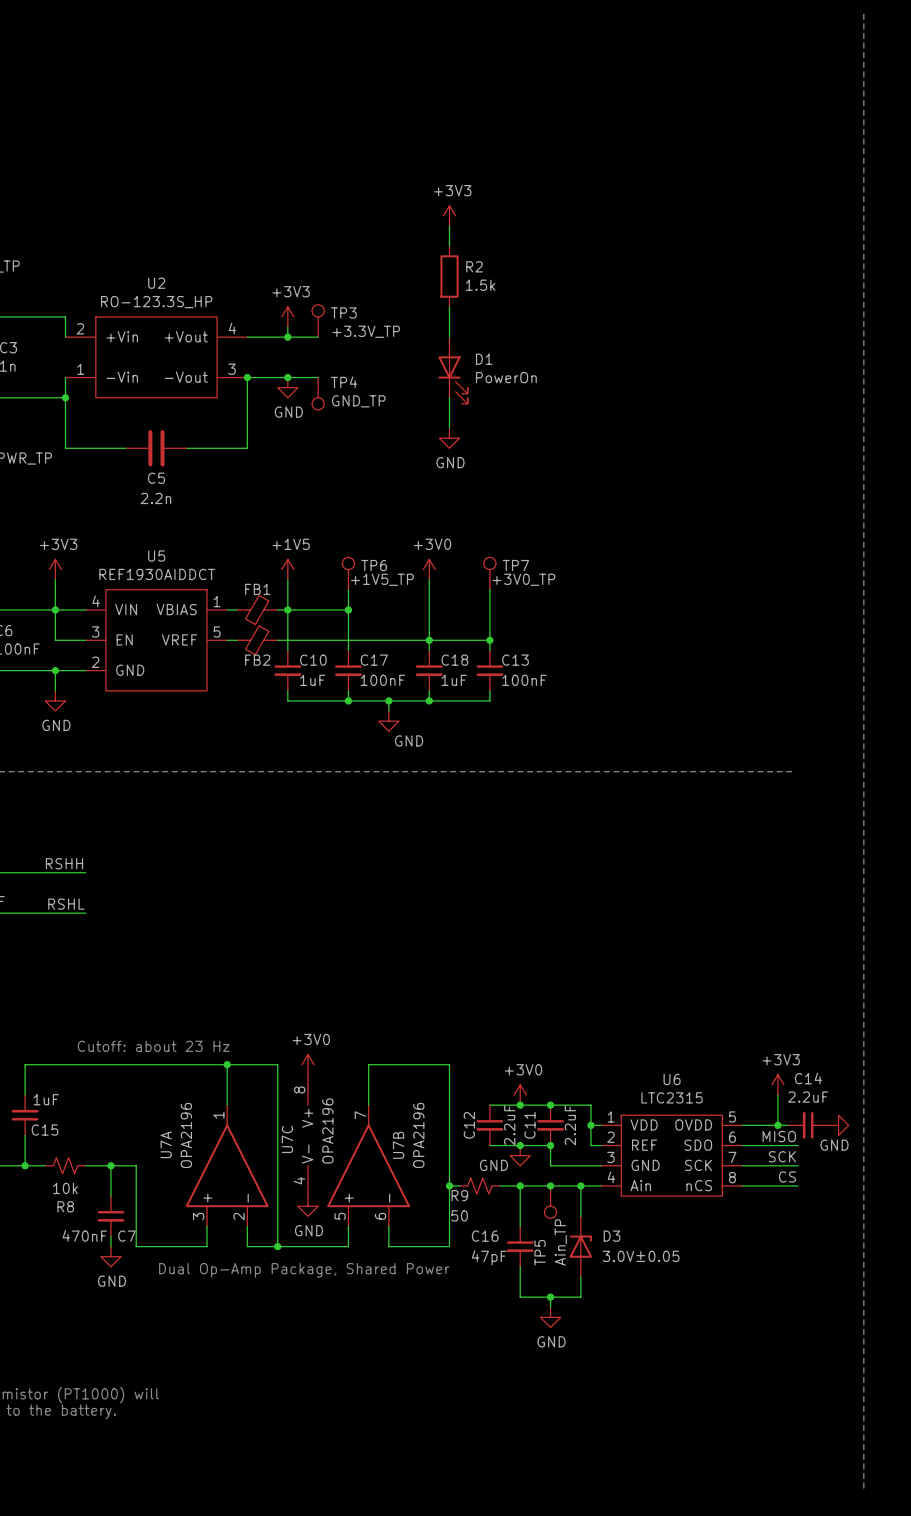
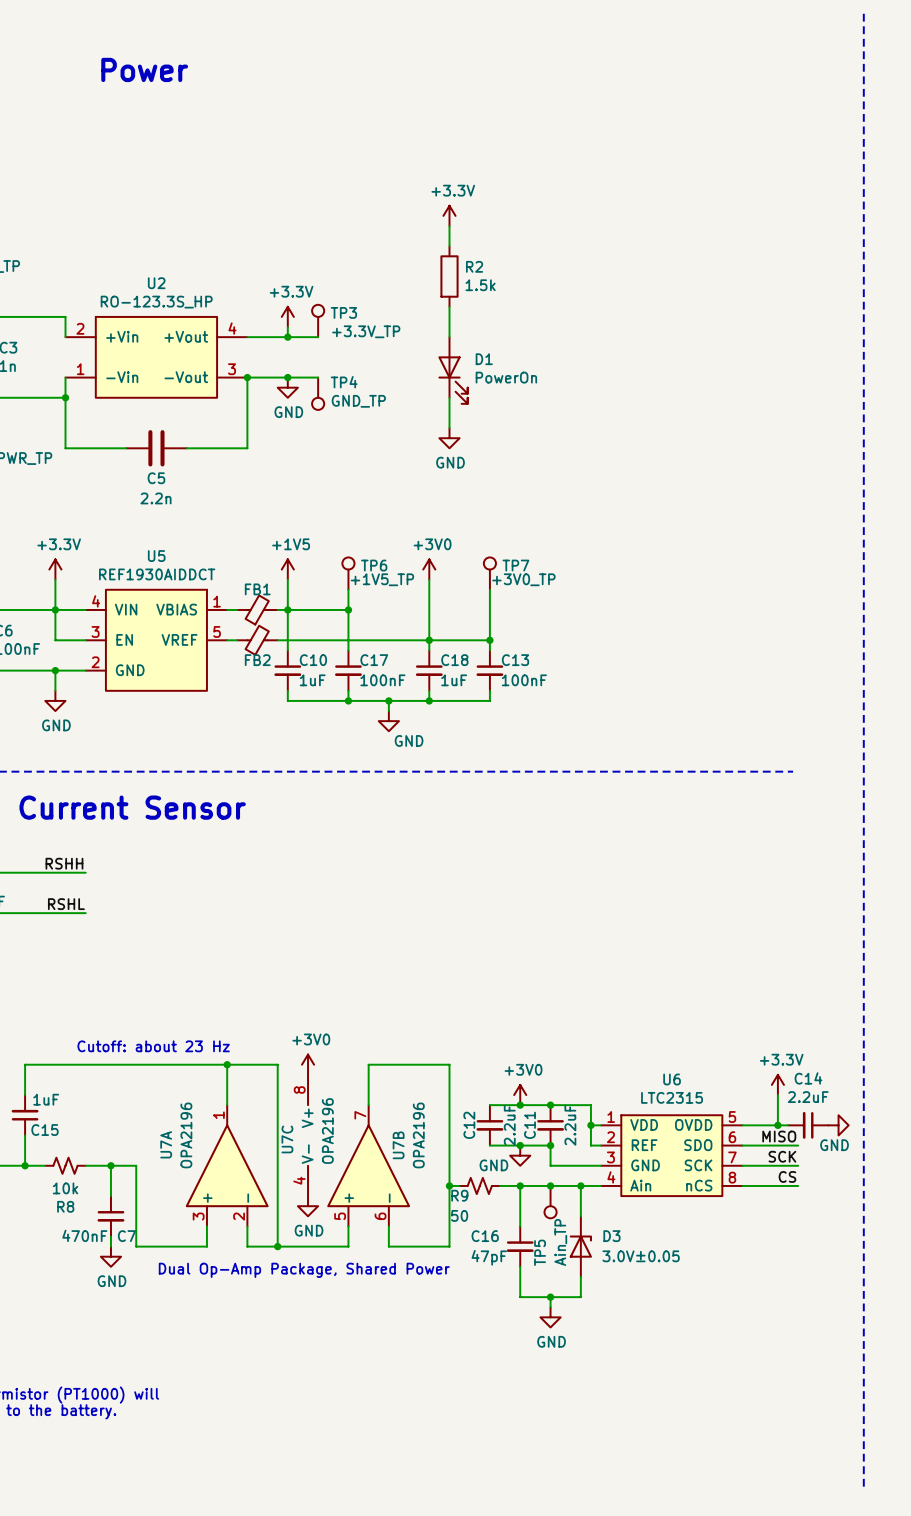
text: none -> Power (144, 69)
power symbol: +3V3 (449, 215) -> +3.3V (449, 215)
power symbol: +3V3 (287, 316) -> +3.3V (287, 316)
power symbol: +3V3 (55, 569) -> +3.3V (55, 569)
text: none -> Current Sensor (132, 807)
power symbol: +3V3 (777, 1084) -> +3.3V (777, 1084)

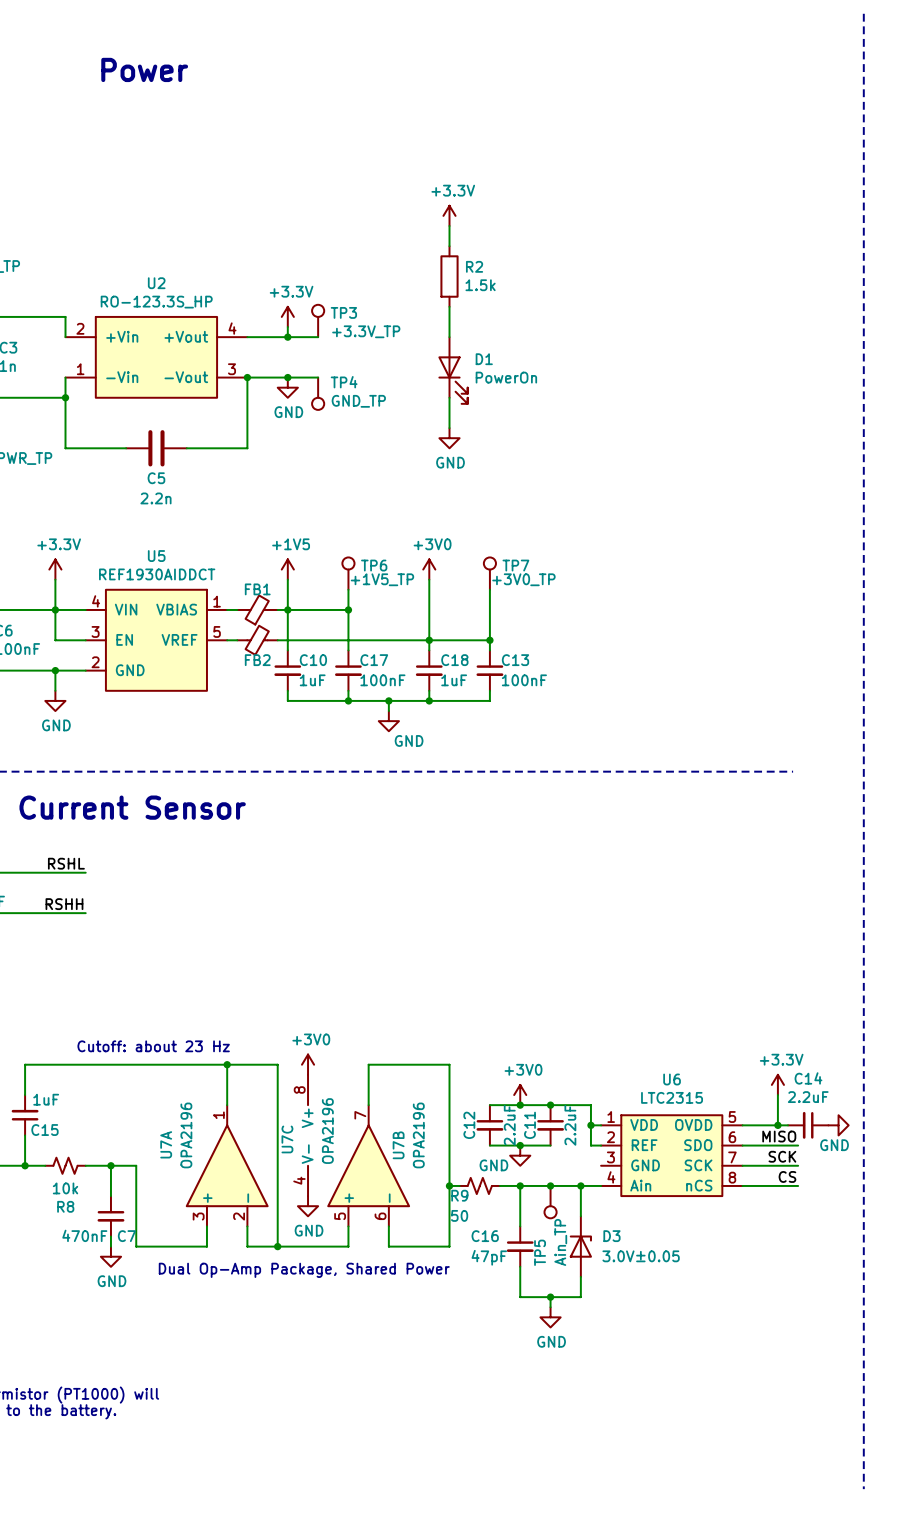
label: RSHH (64, 863) -> RSHL (66, 863)
label: RSHL (66, 904) -> RSHH (64, 904)
wire: (550, 1145) (550, 1165) (601, 1165) -> none
junction: (550, 1145) -> none

